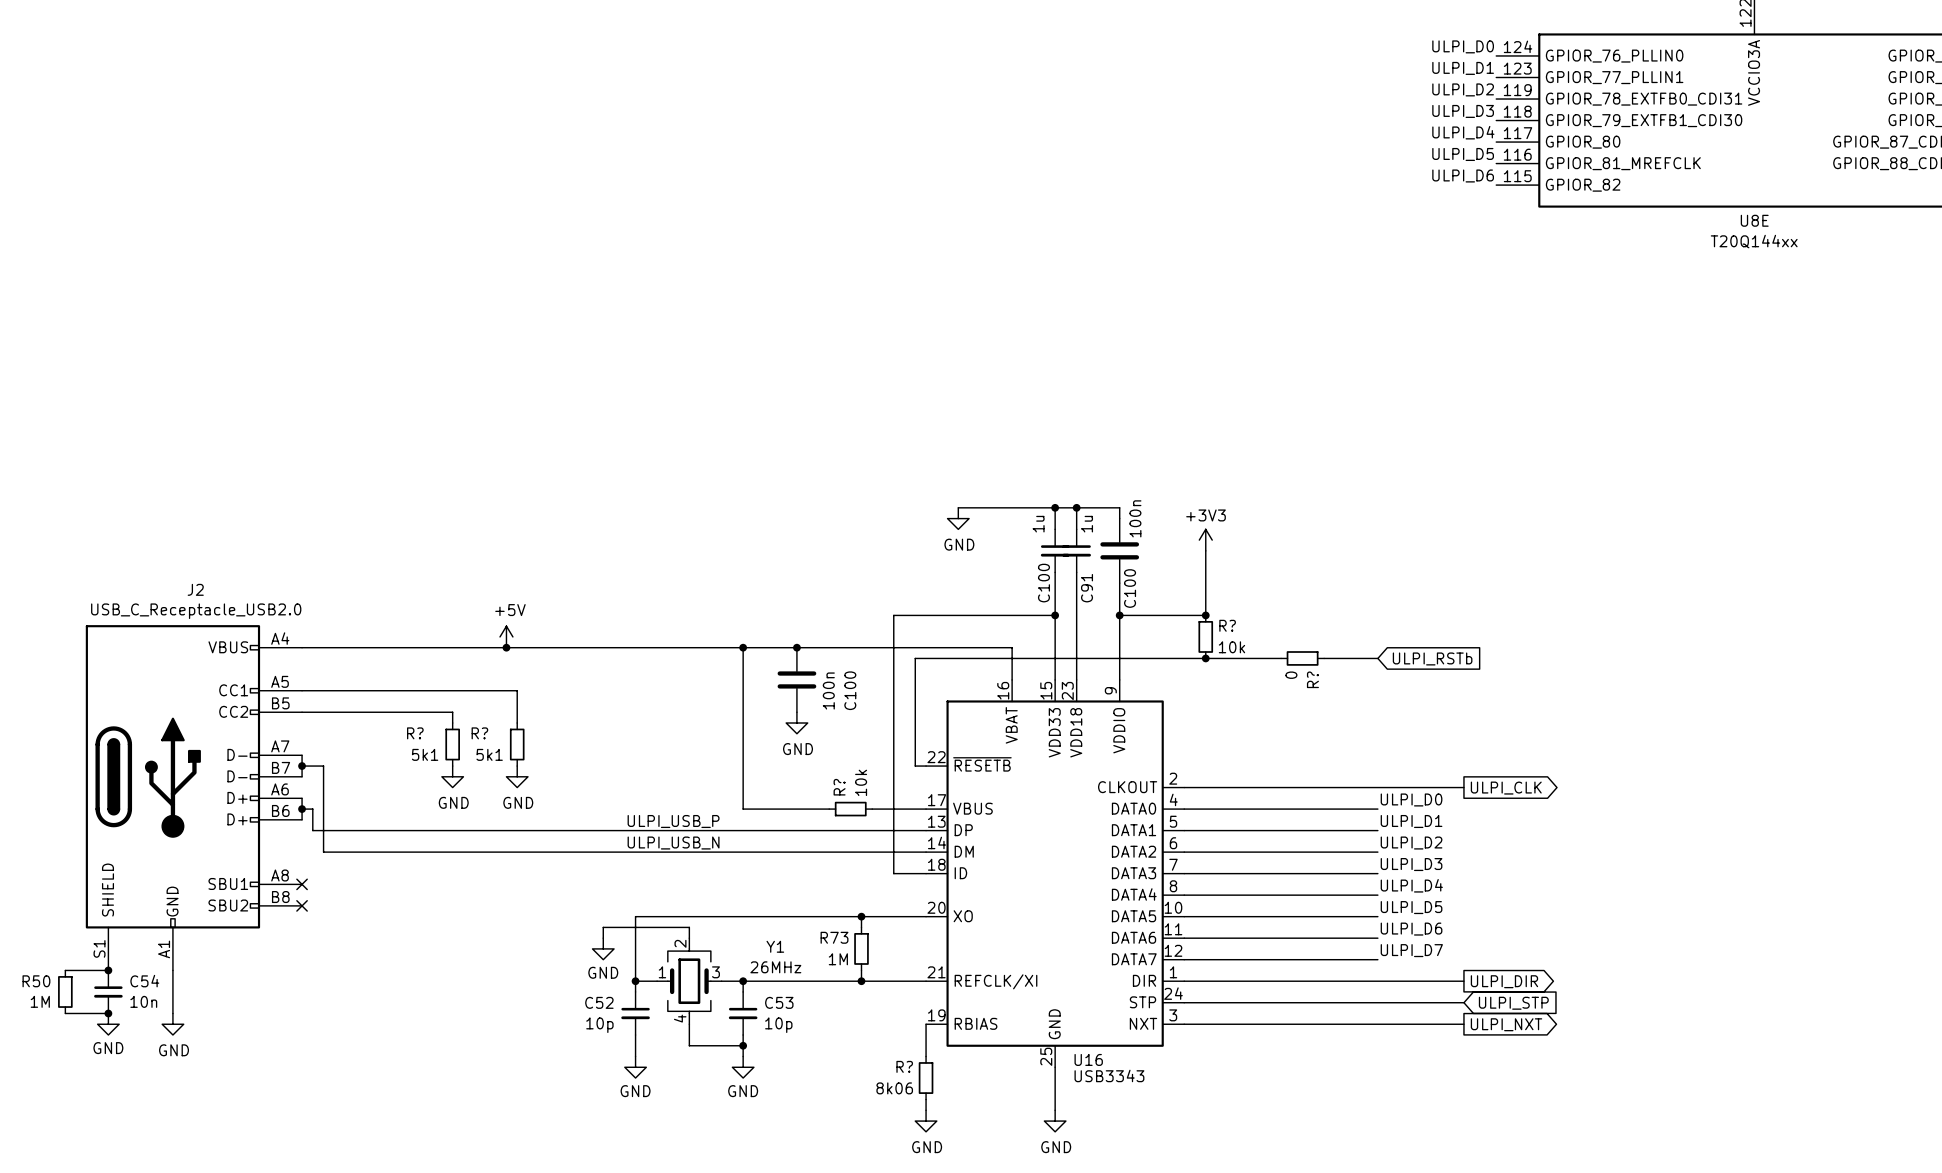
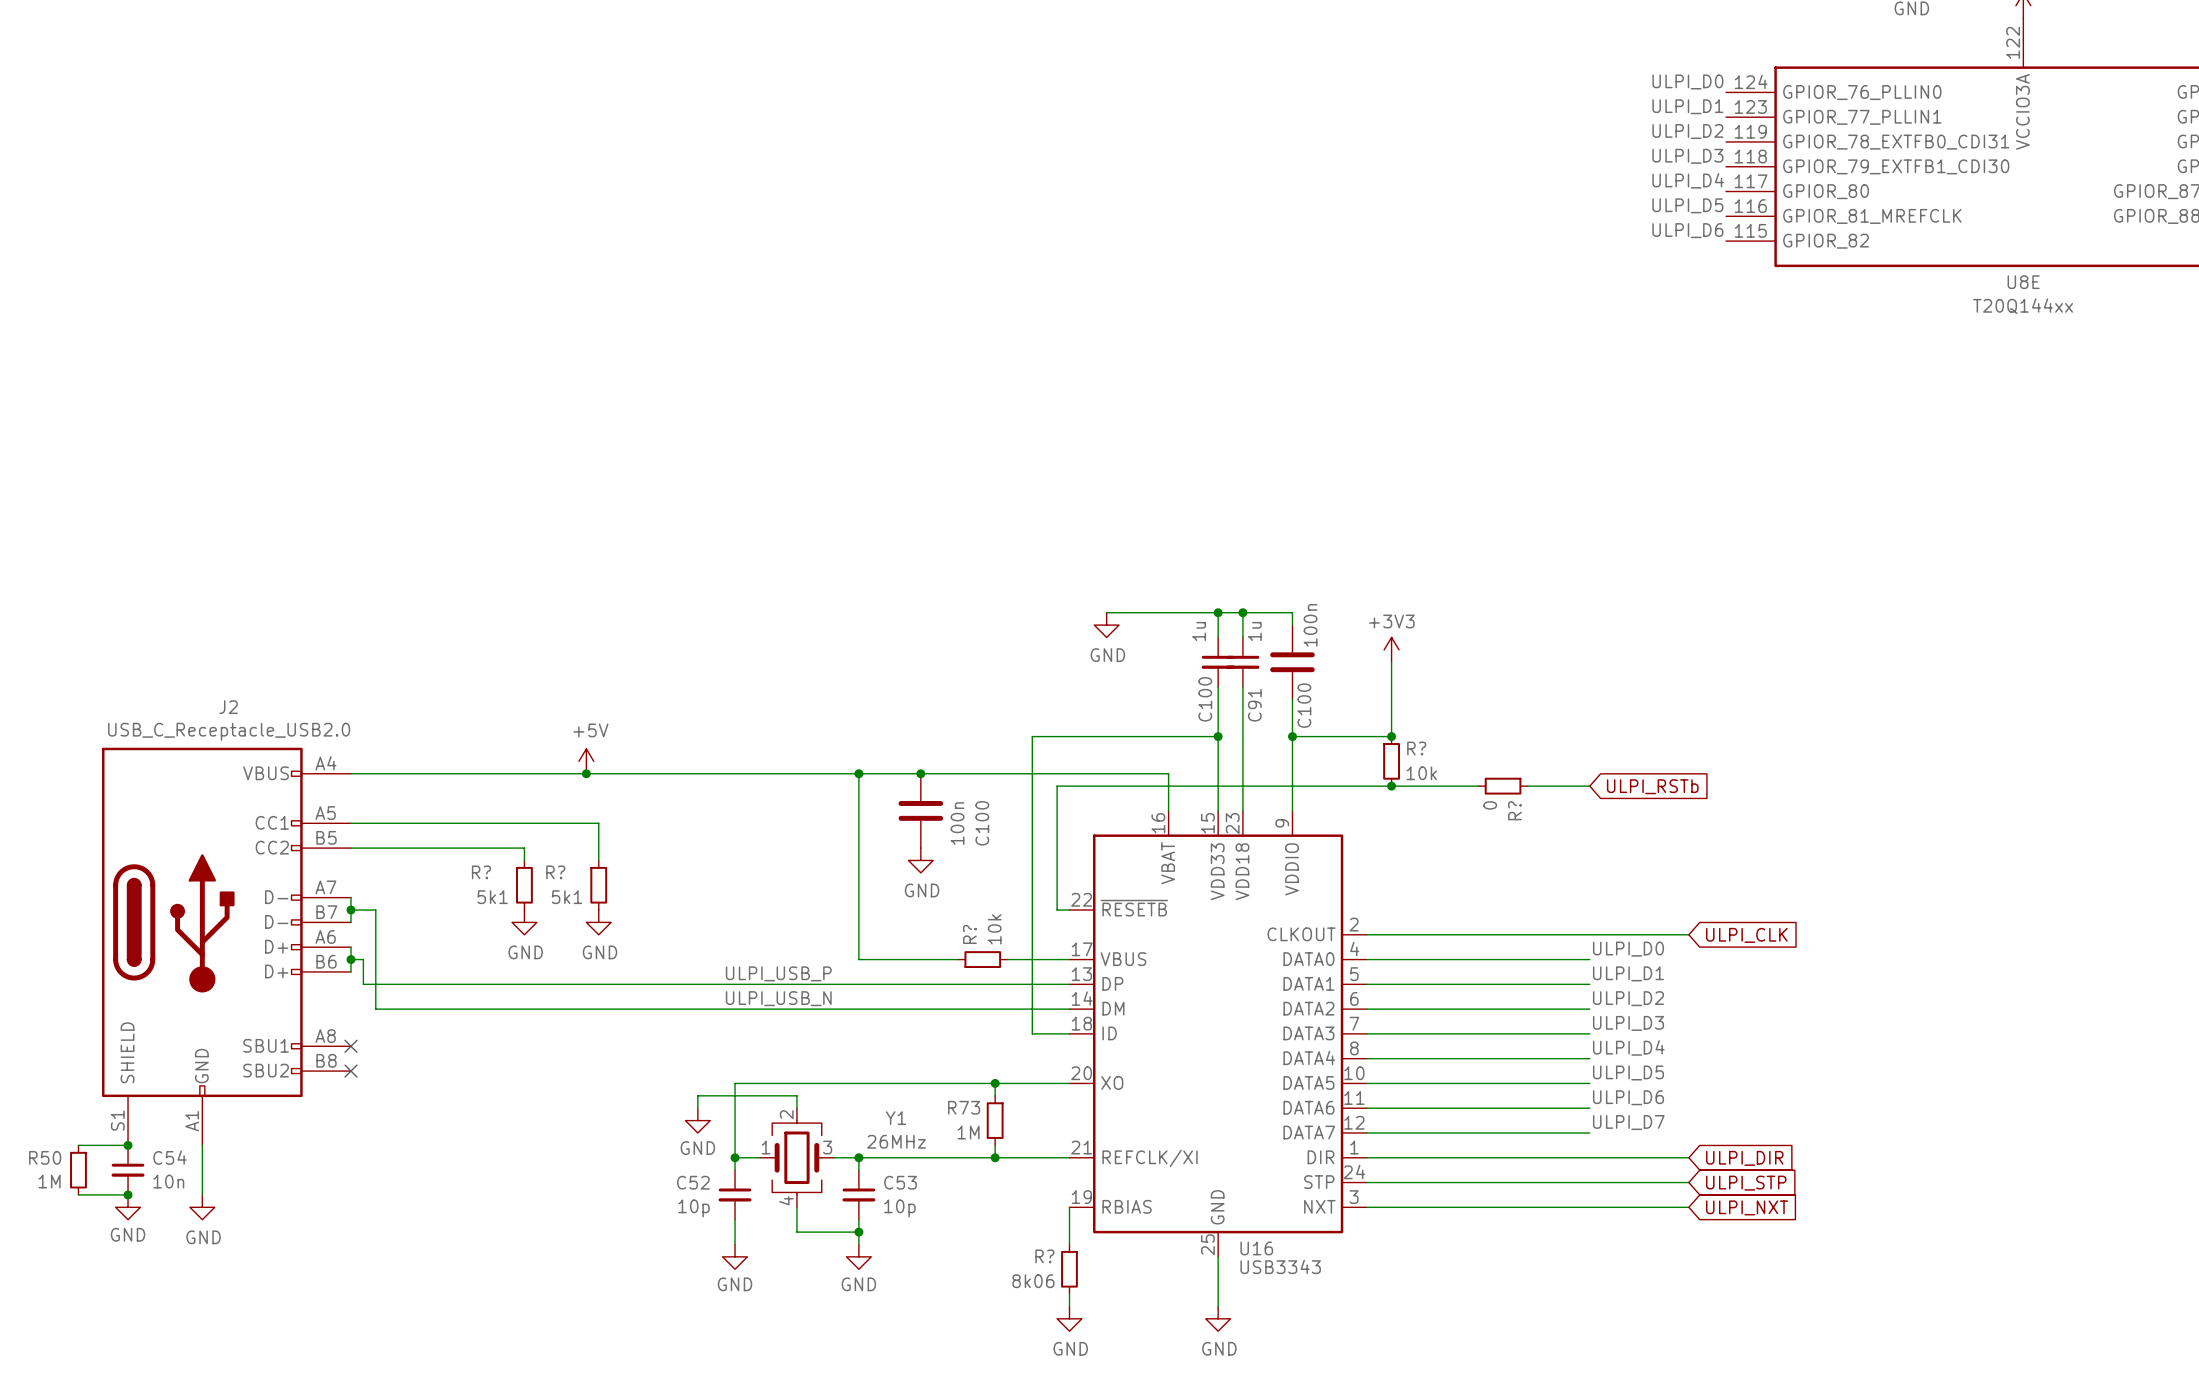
global label shape: output (1506, 788) -> input (1746, 935)
global label shape: output (1504, 981) -> input (1744, 1158)
global label shape: output (1506, 1024) -> input (1747, 1207)

